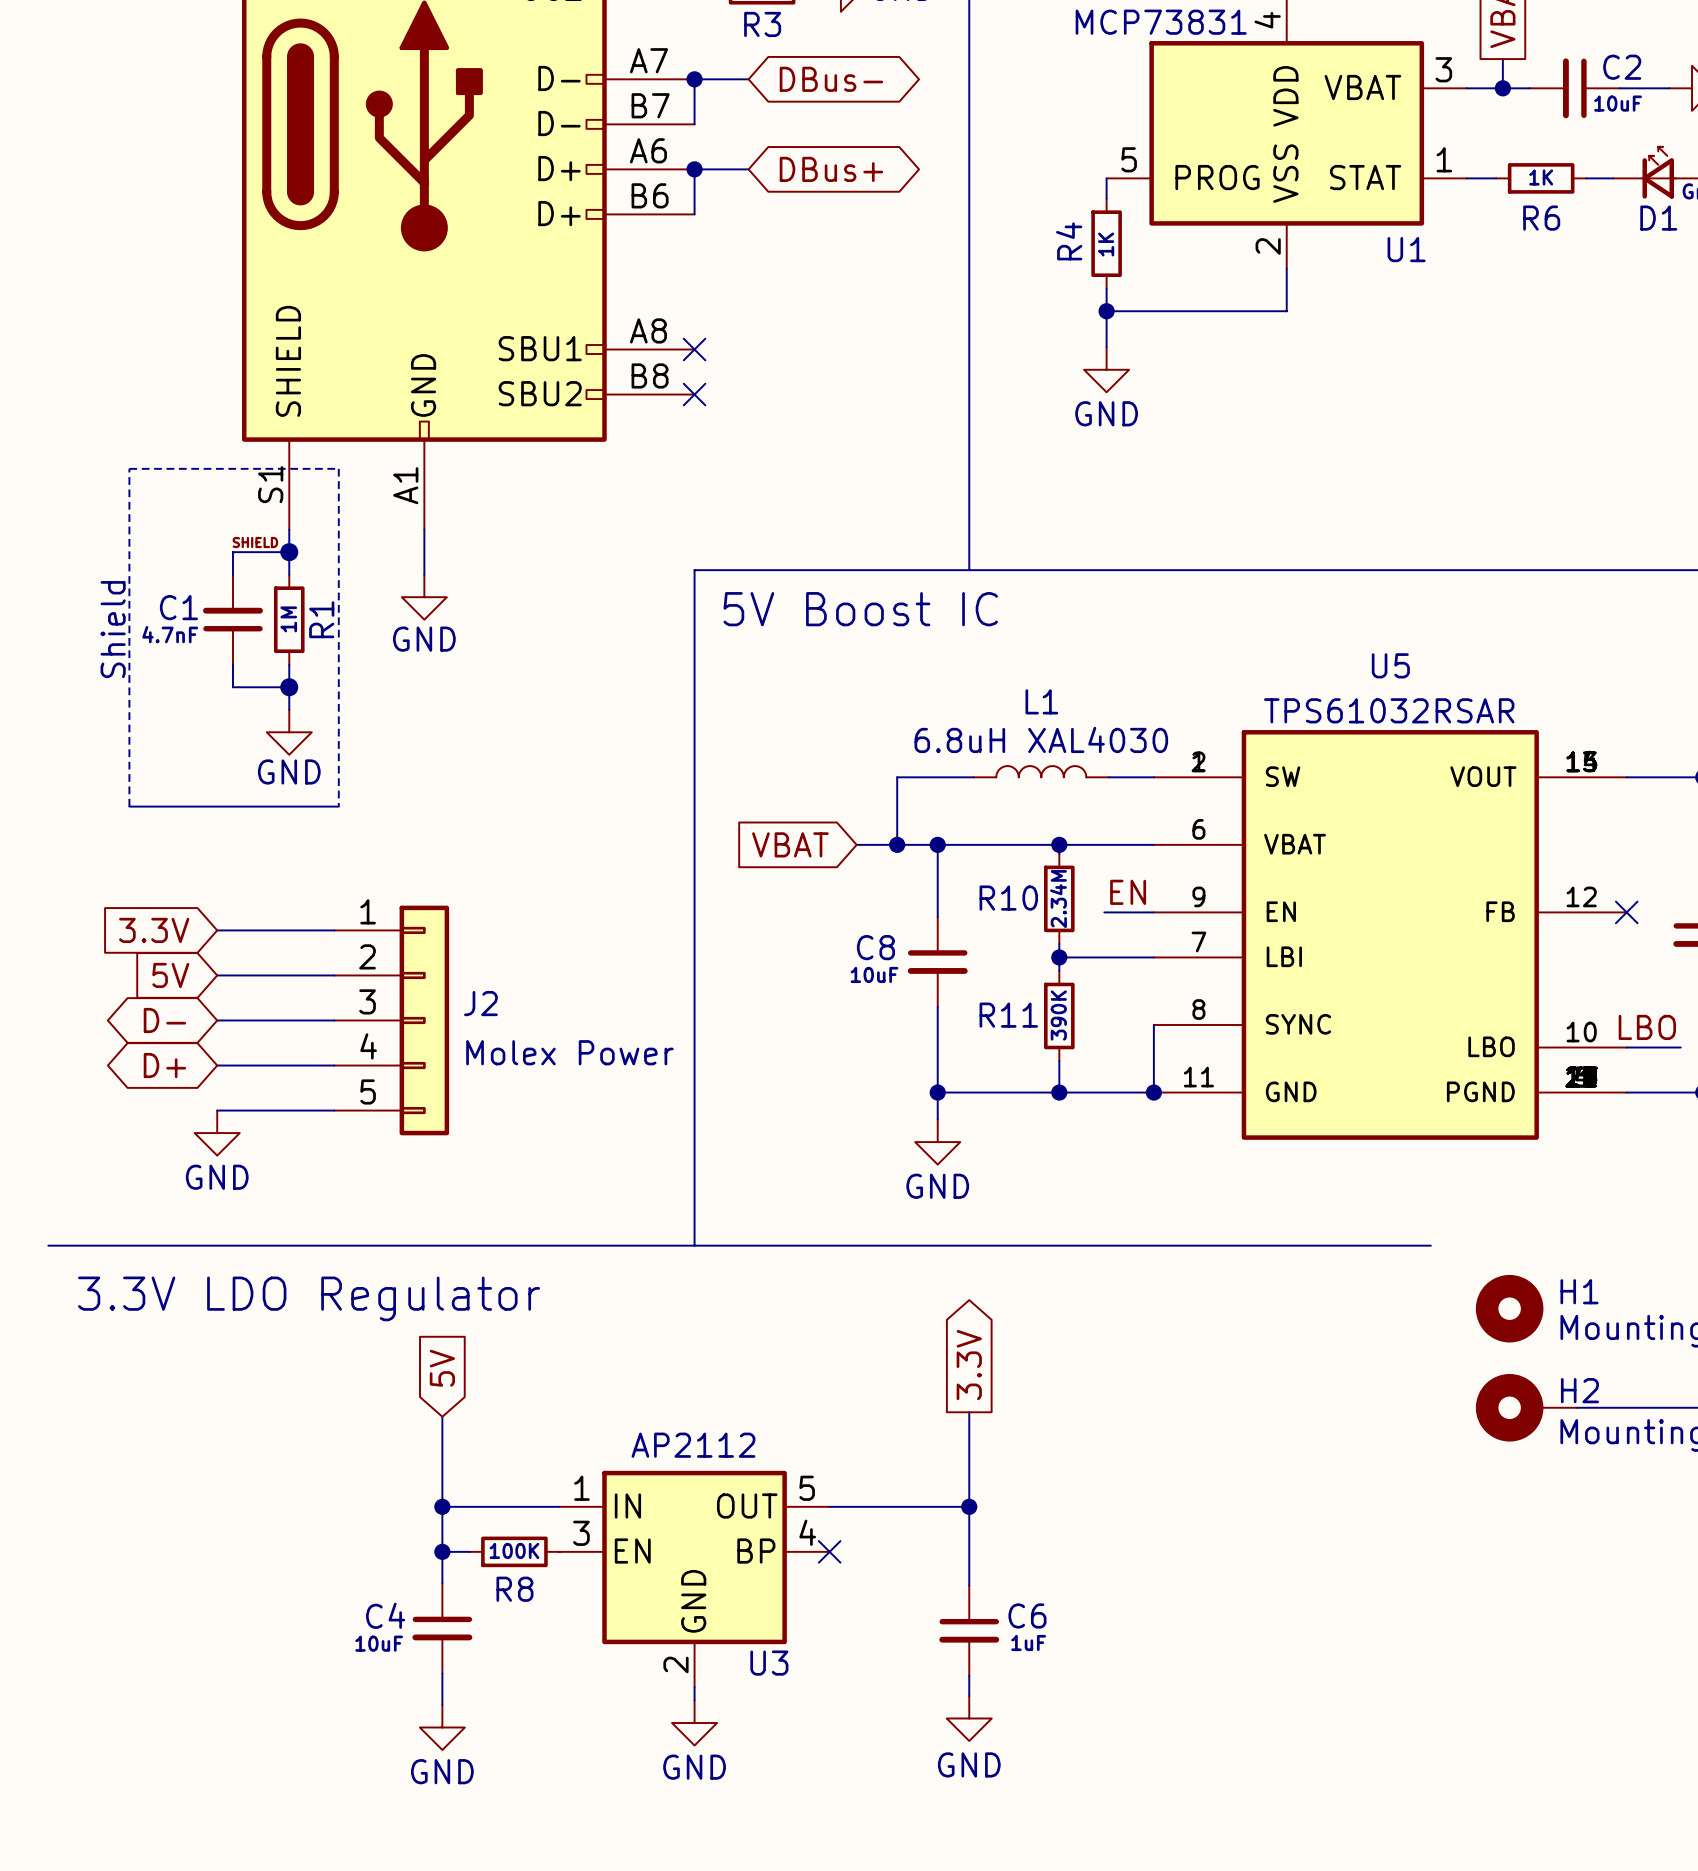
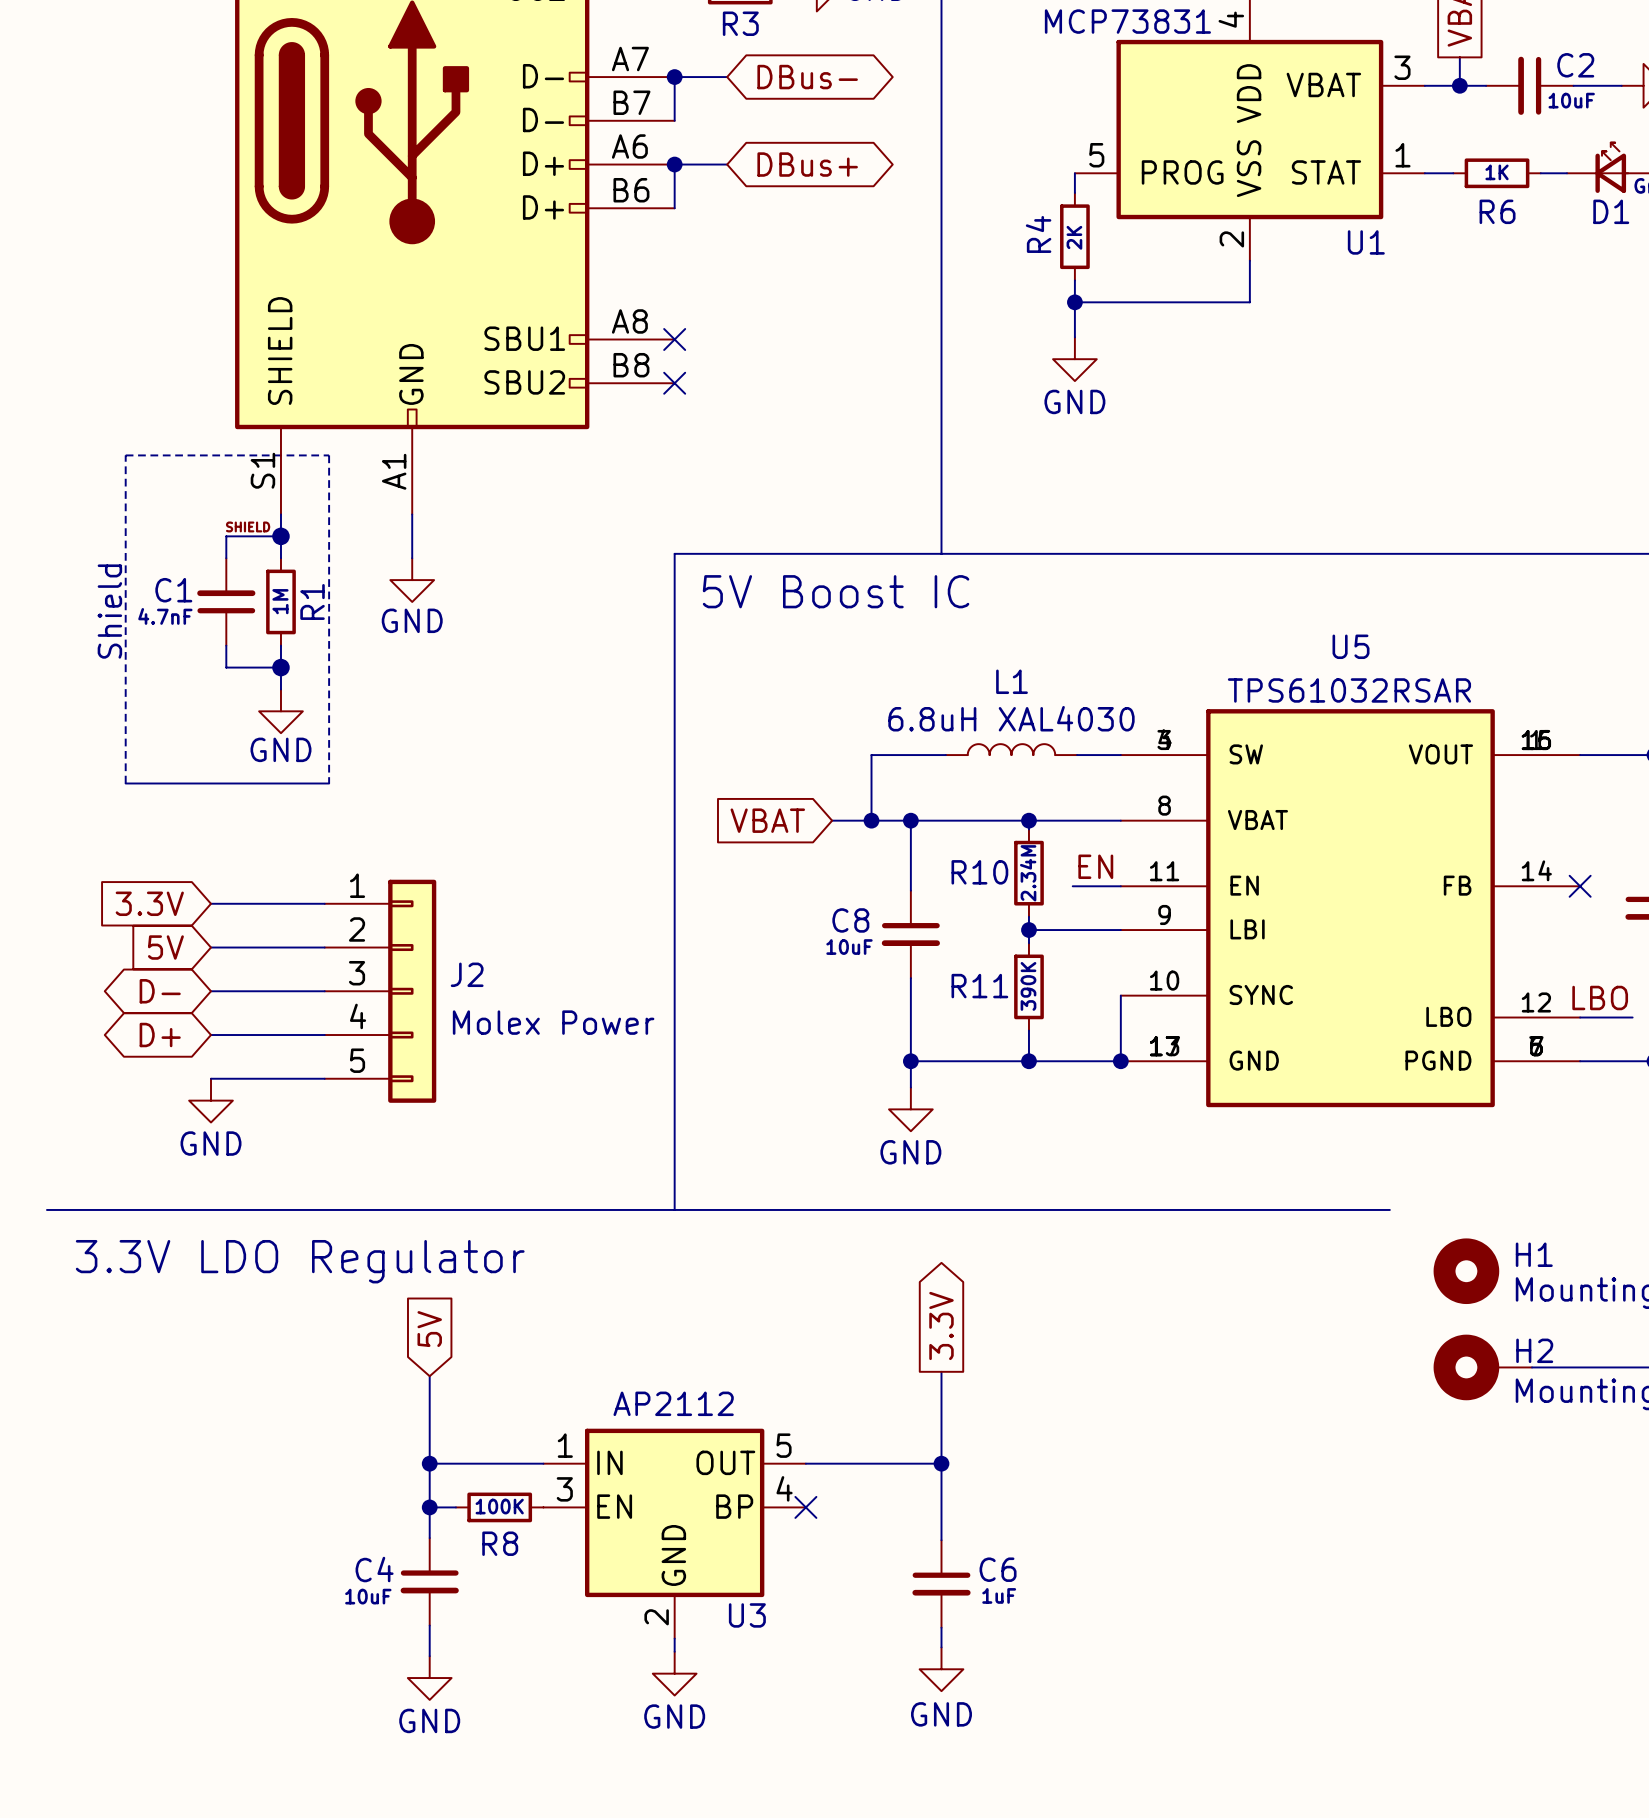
R4 value: 1K (1106, 244) -> 2K (1074, 237)
U5 symbol: [1153, 730, 1627, 1140] -> [1120, 709, 1581, 1108]

